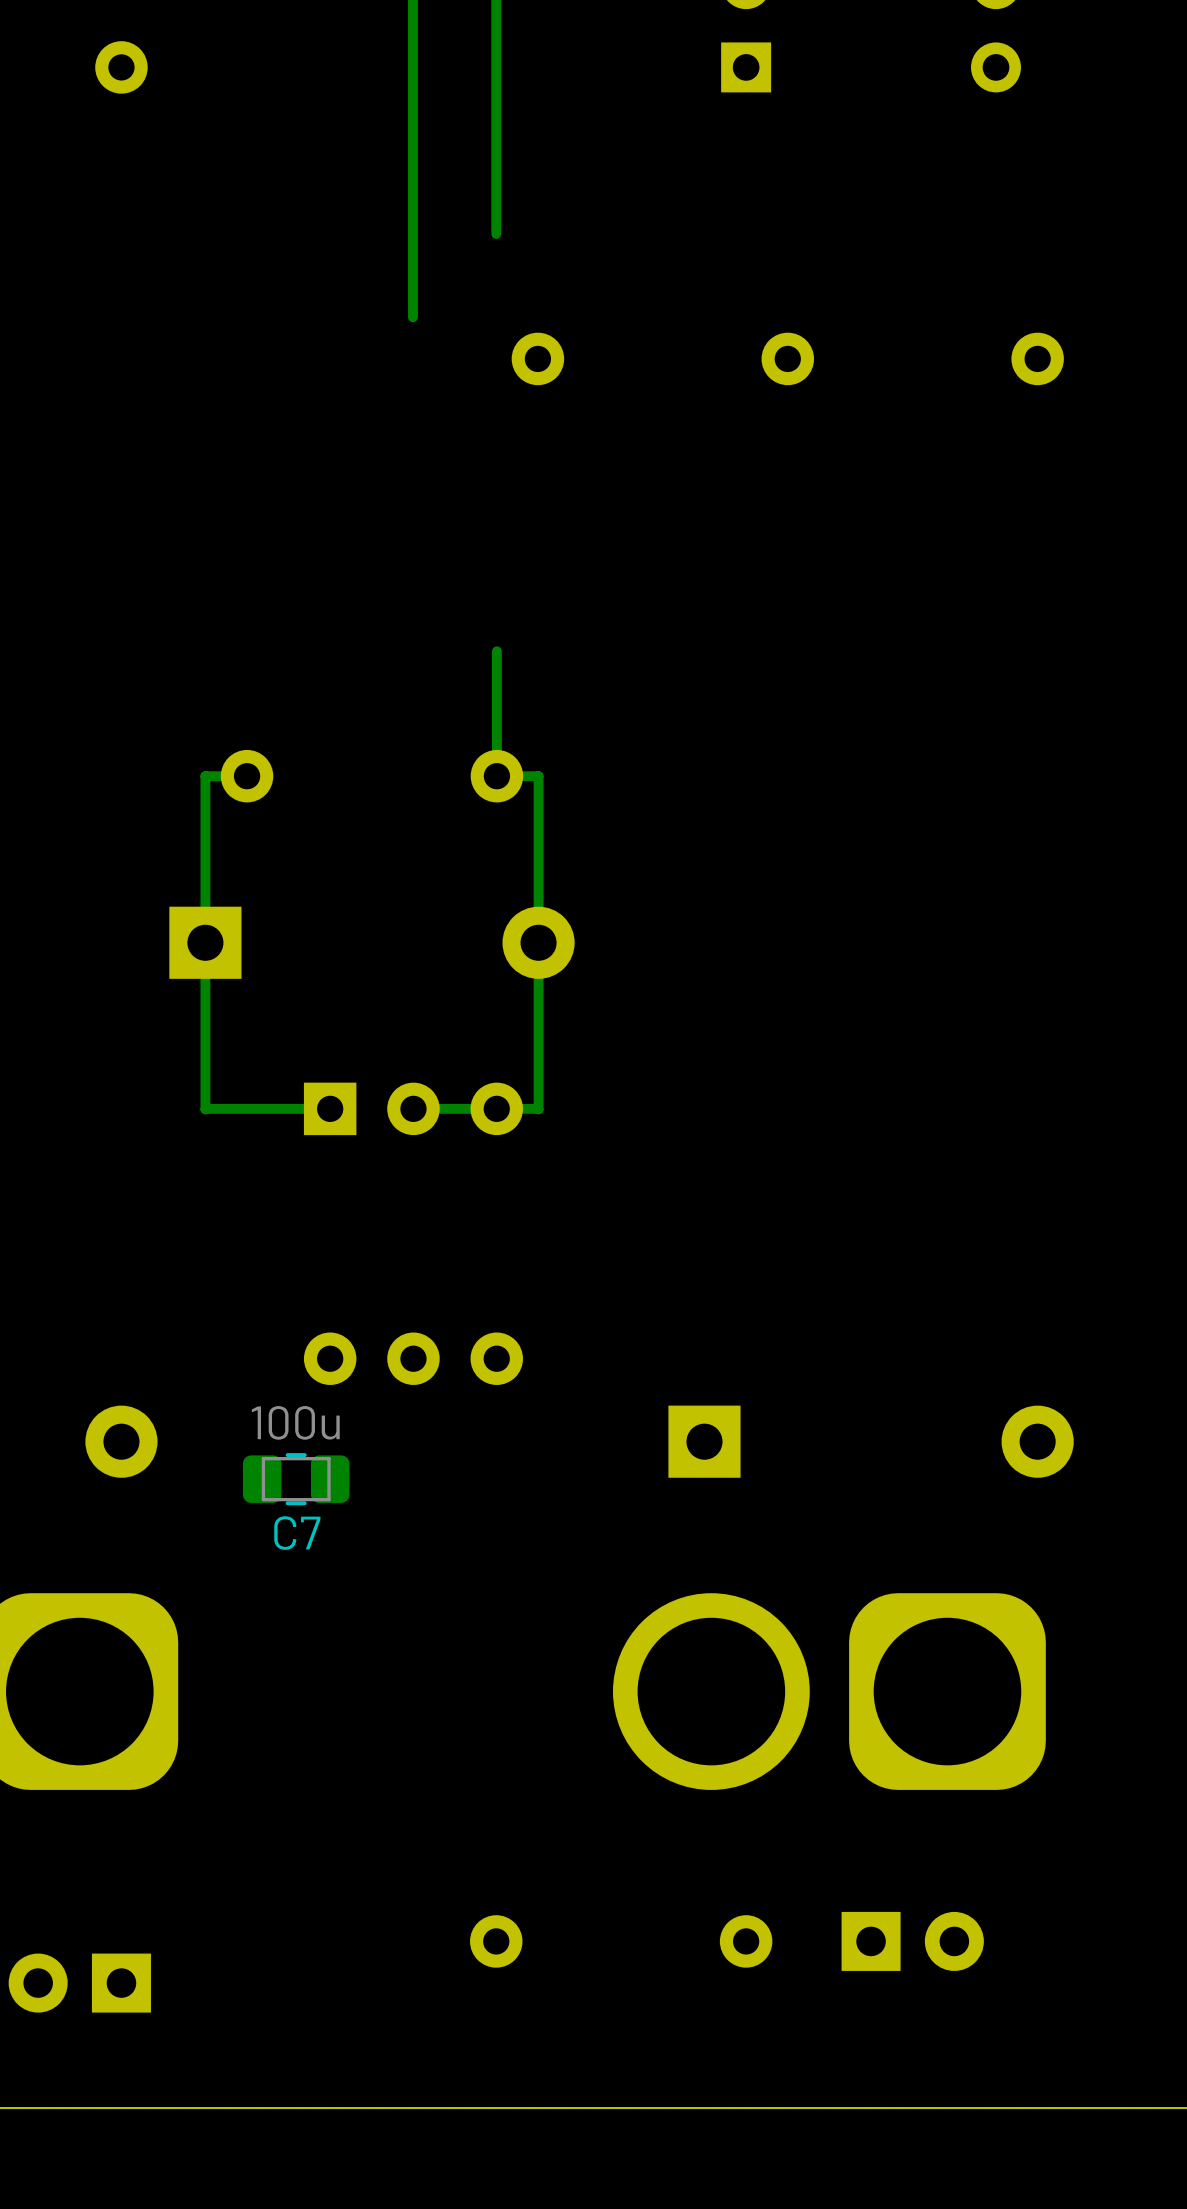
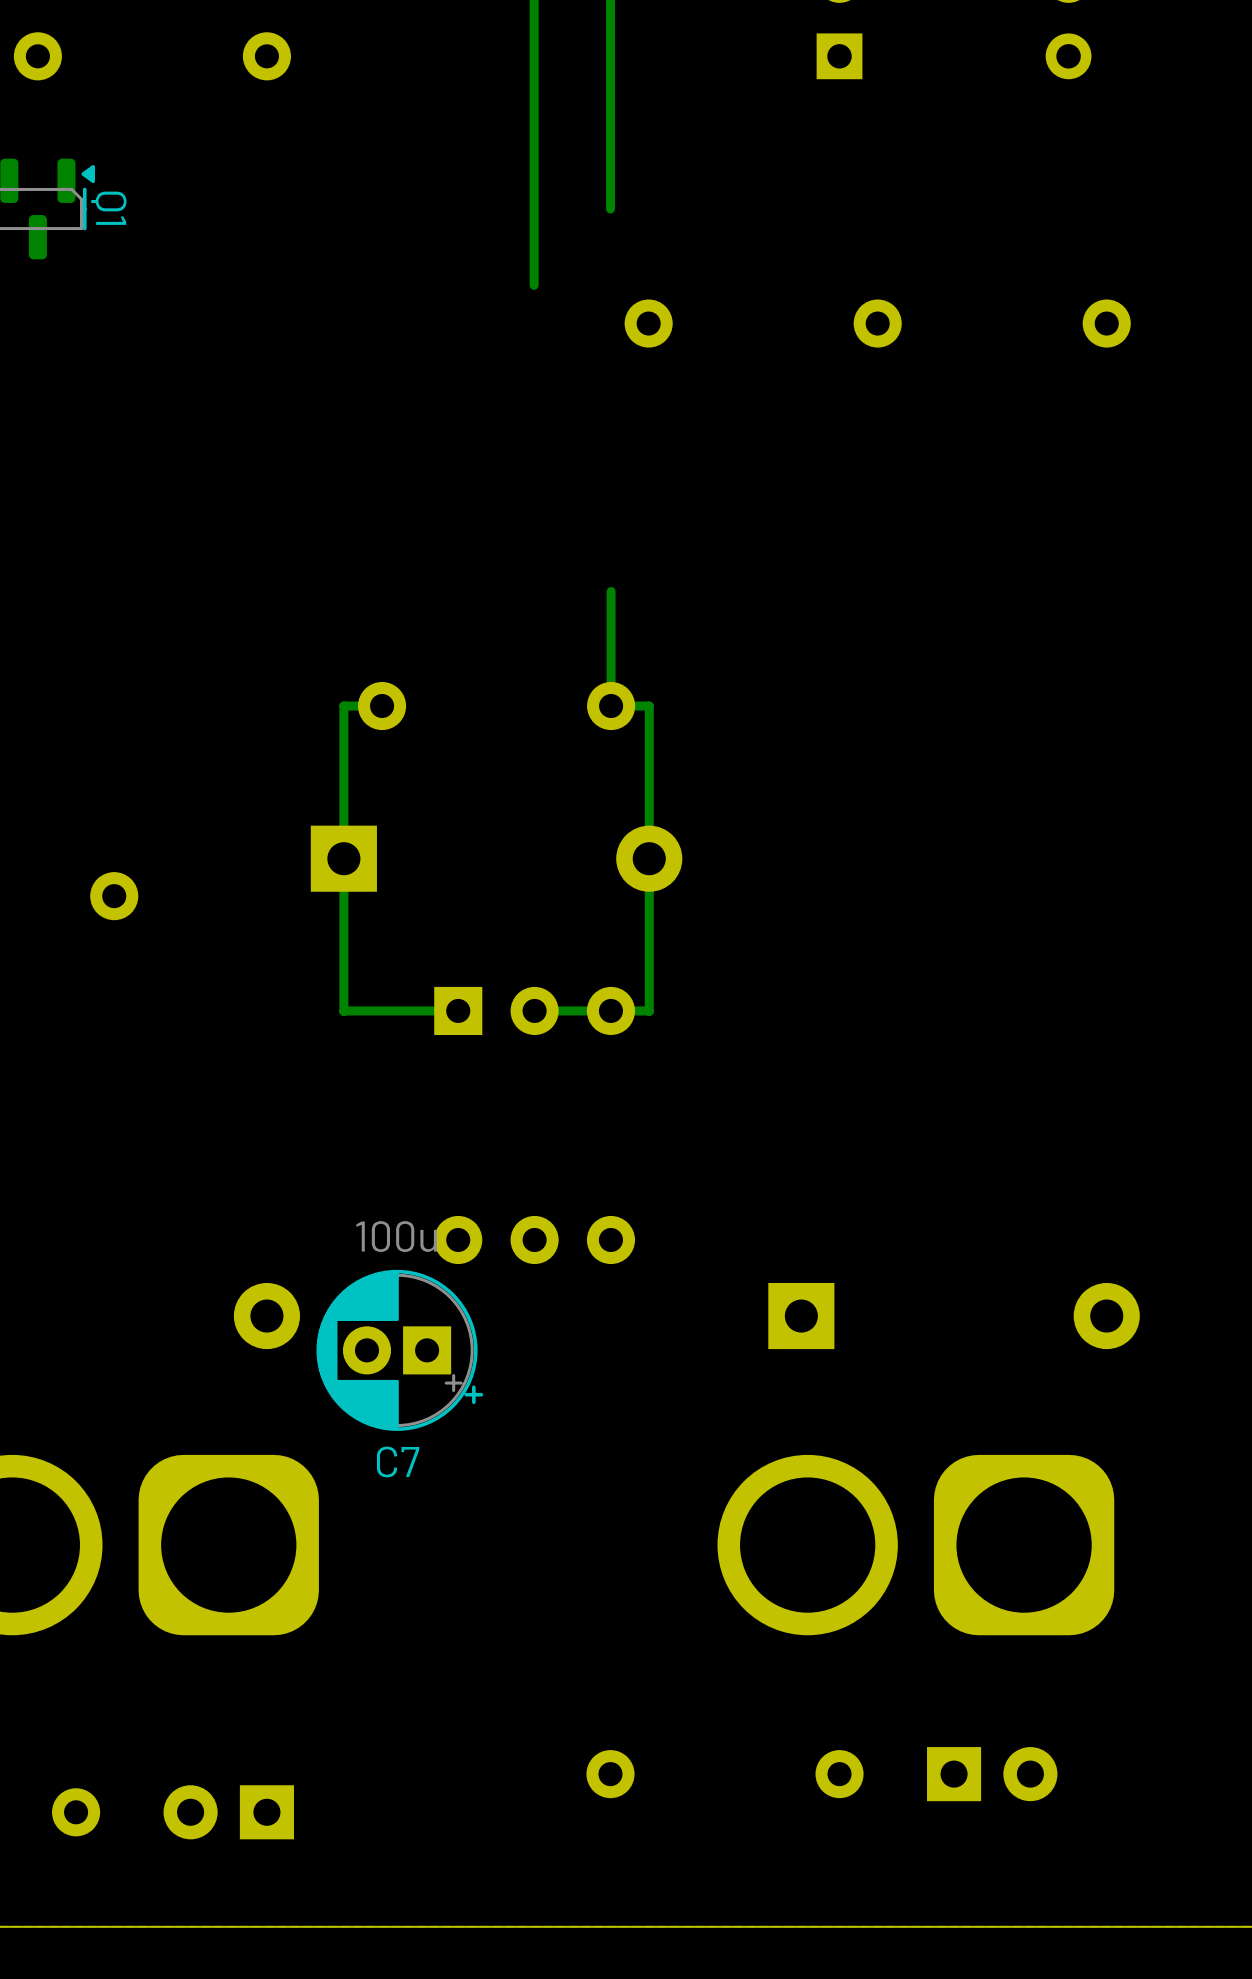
C7 value position: 100u (295, 1422) -> 100u (396, 1236)
C7 footprint: [242, 1453, 350, 1506] -> [316, 1269, 484, 1431]
C7 name position: C7 (297, 1533) -> C7 (398, 1462)

